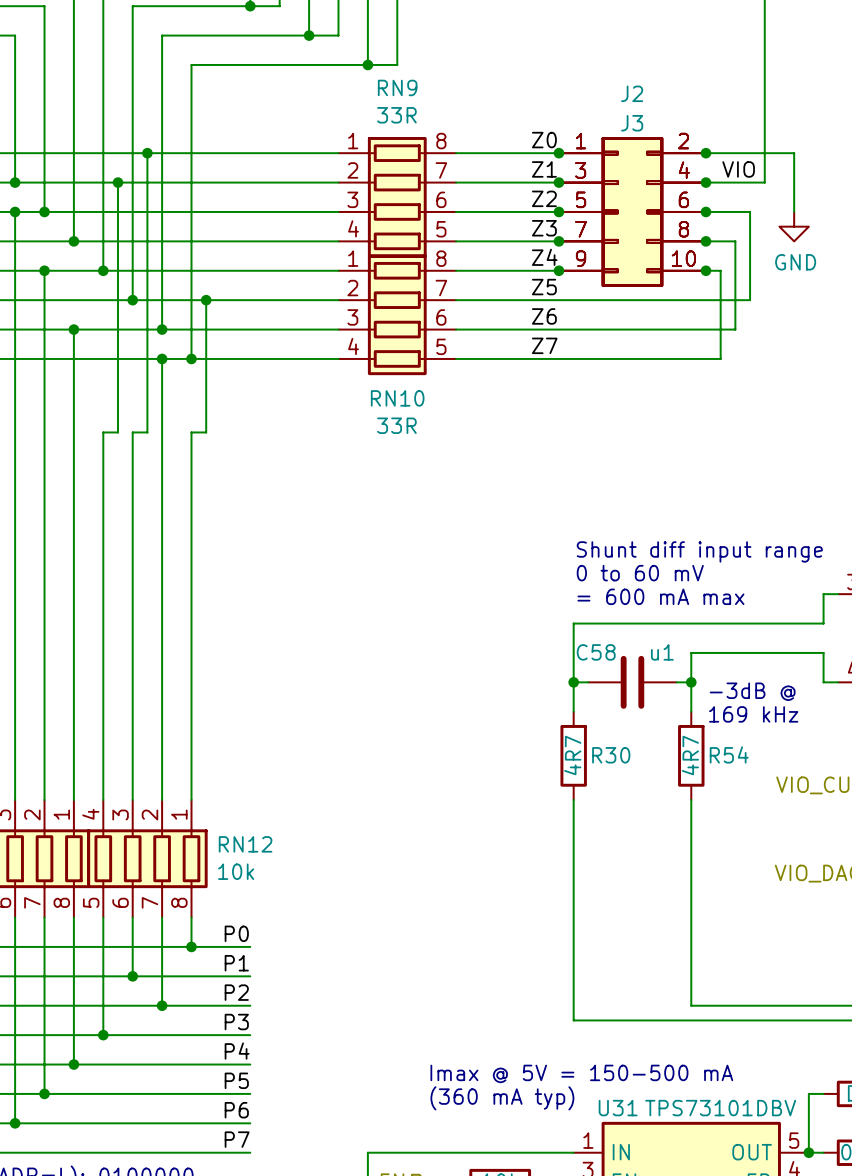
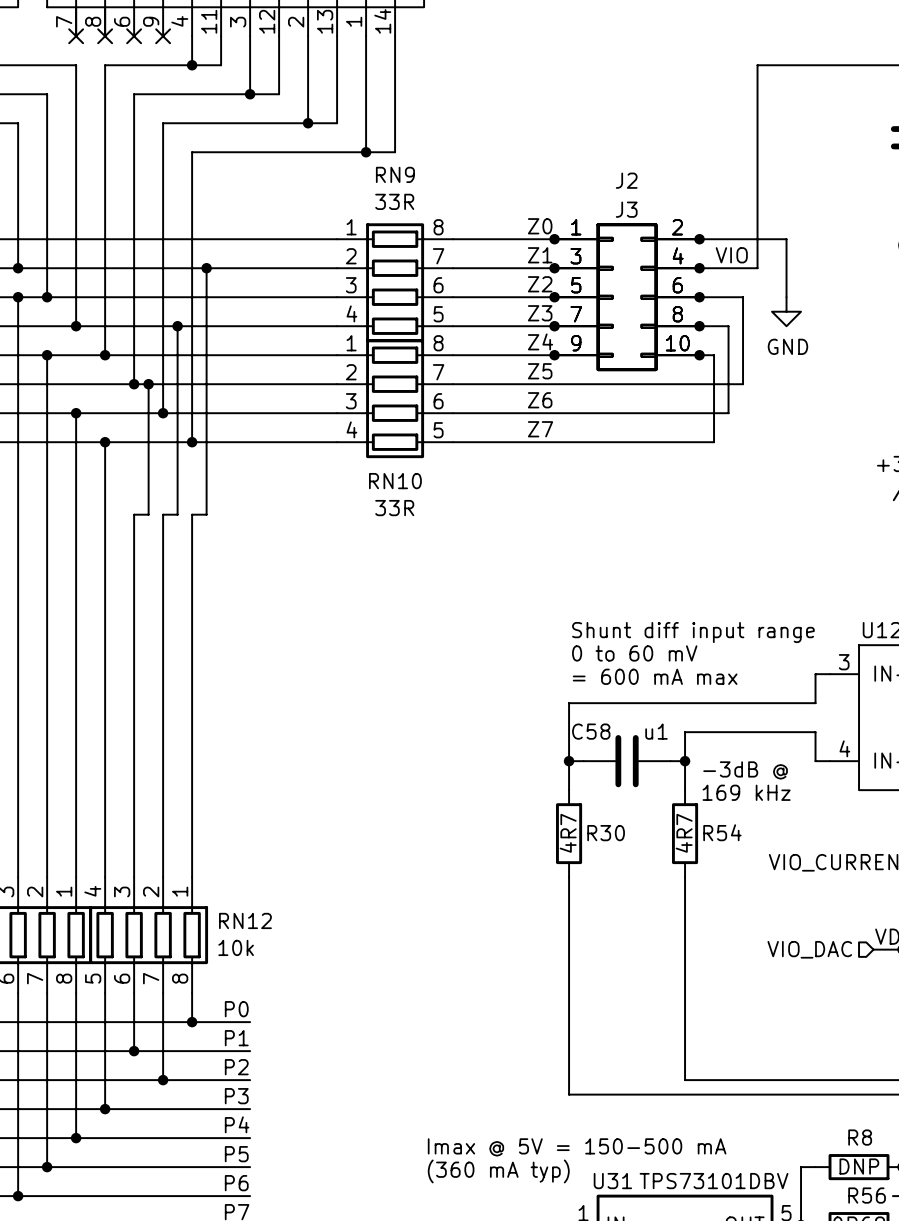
wire: (147, 153) (147, 300) -> none
junction: (147, 153) -> none
wire: (118, 182) (118, 432) (103, 432) -> (105, 442) (105, 514)
junction: (118, 182) -> none
wire: none -> (206, 268) (206, 384)
junction: none -> (206, 268)
junction: none -> (177, 326)
junction: none -> (148, 384)
junction: (206, 300) -> none
junction: none -> (105, 442)
wire: (162, 358) (162, 432) -> (177, 326) (177, 514) (163, 514)
junction: (162, 358) -> none

